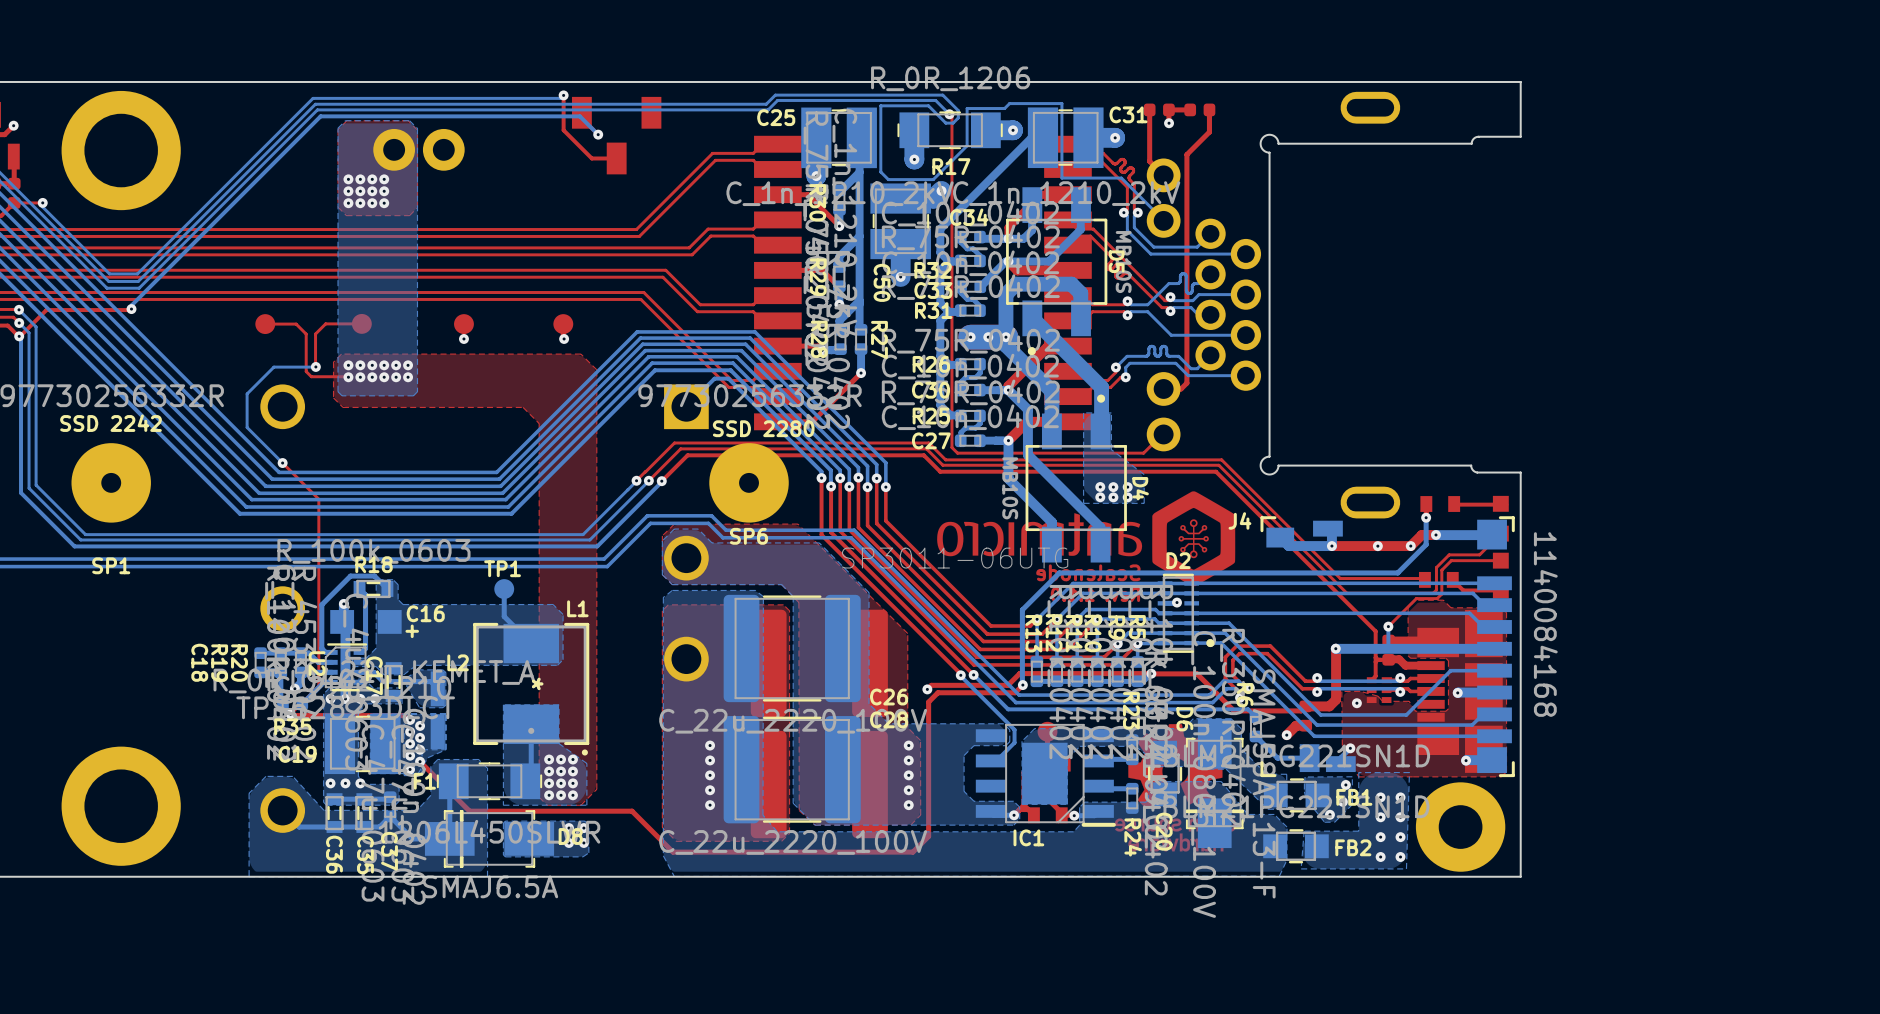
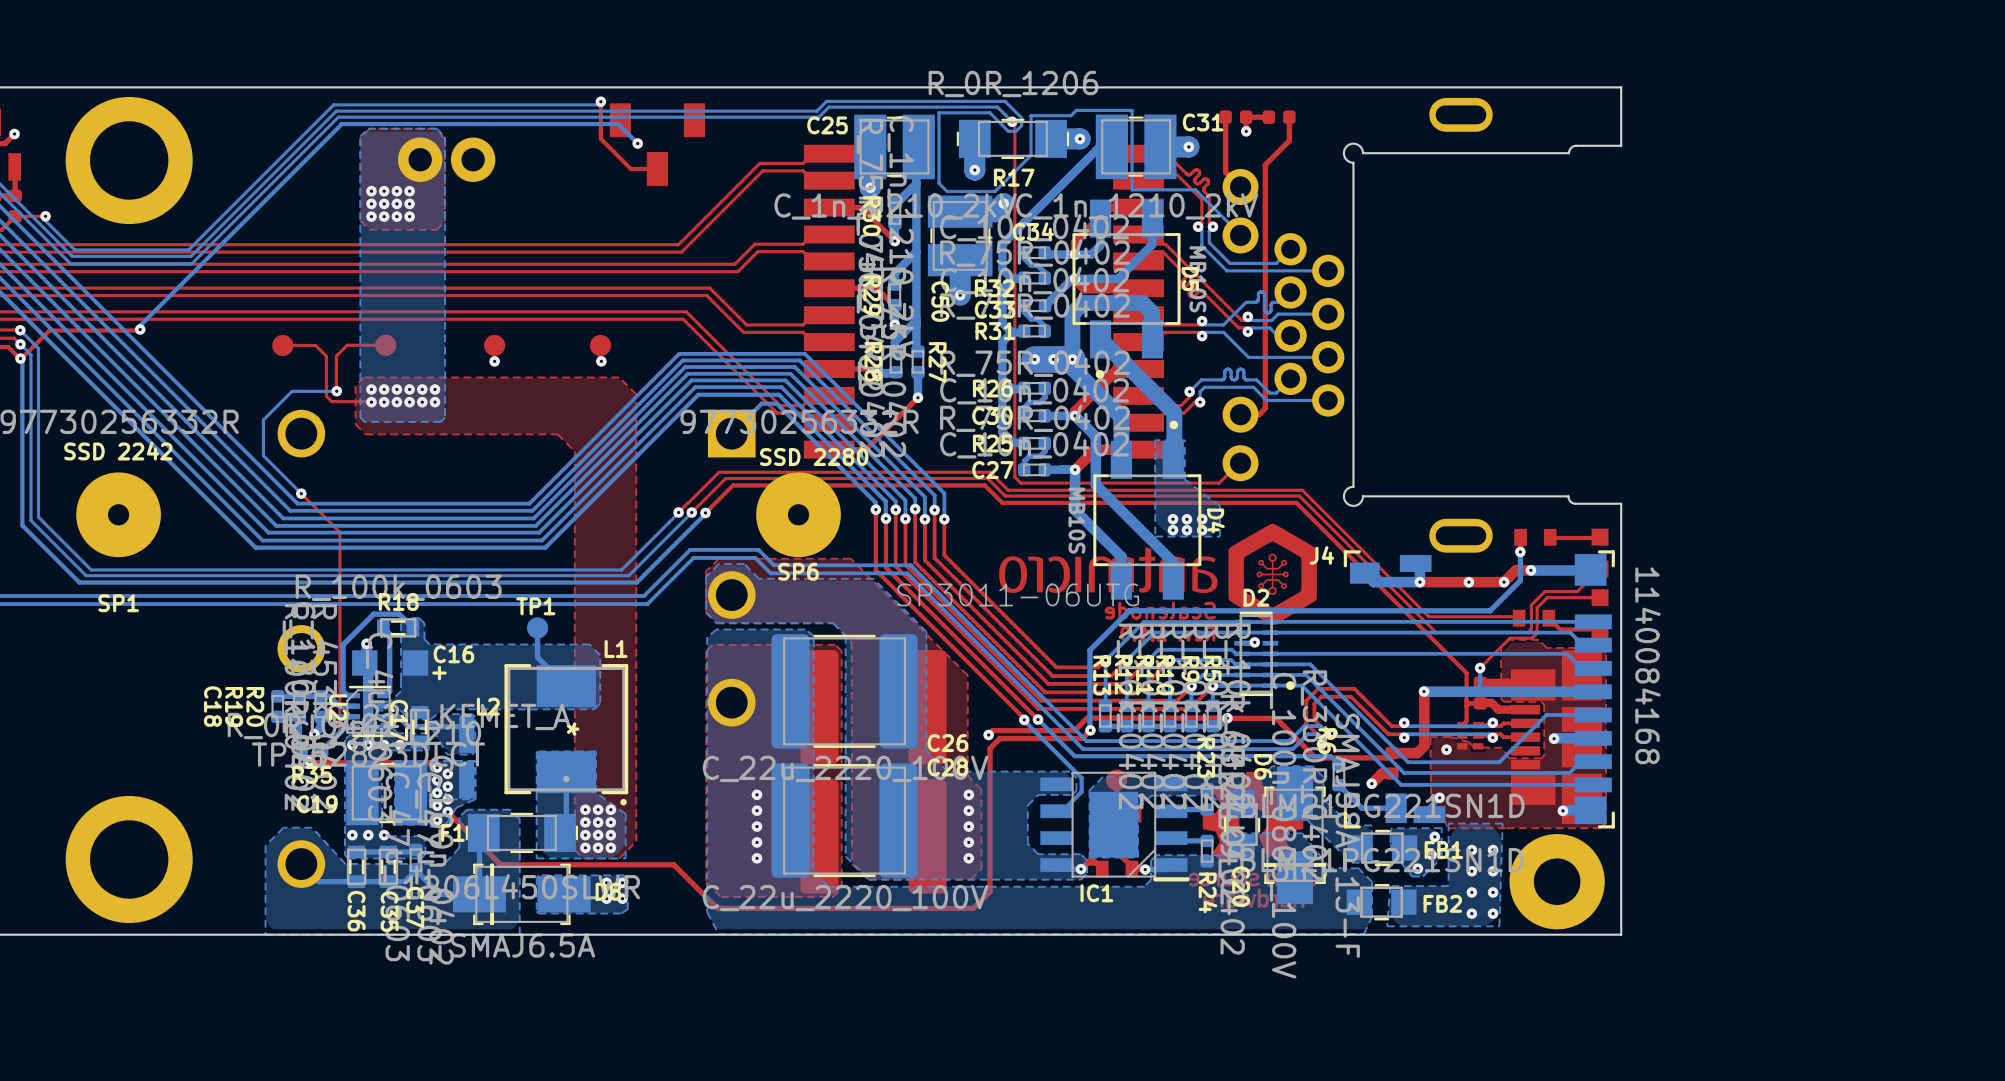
bottom track: (176, 234) (137, 273) (109, 273) (70, 234) -> (188, 249) (74, 249)
bottom track: (179, 240) (138, 281) (108, 281) (67, 240) -> (191, 256) (72, 256)
bottom track: (179, 247) (139, 288) (107, 288) (66, 247) -> (191, 263) (70, 263)

